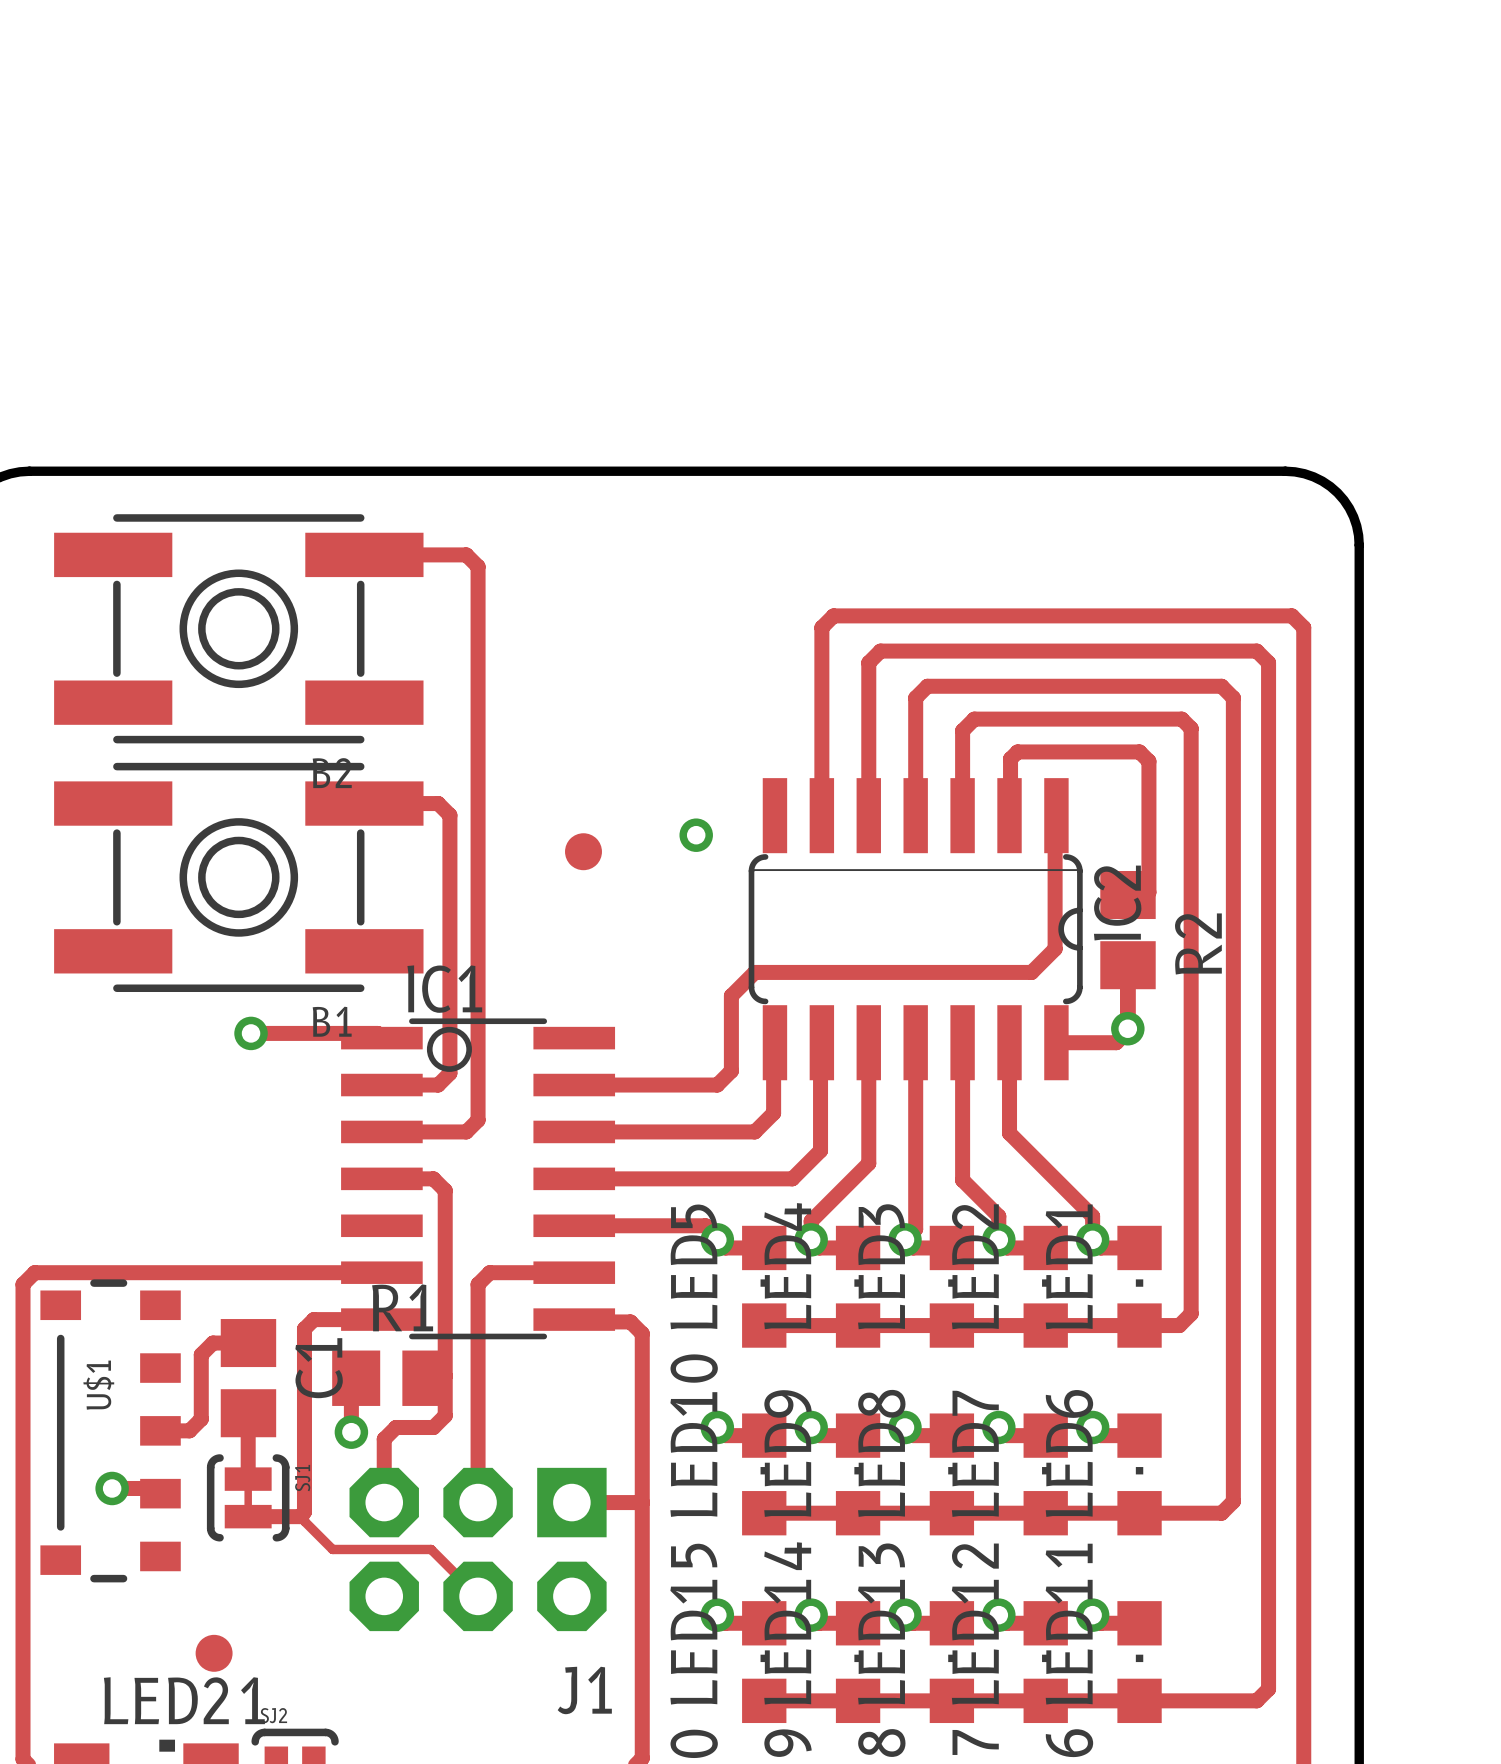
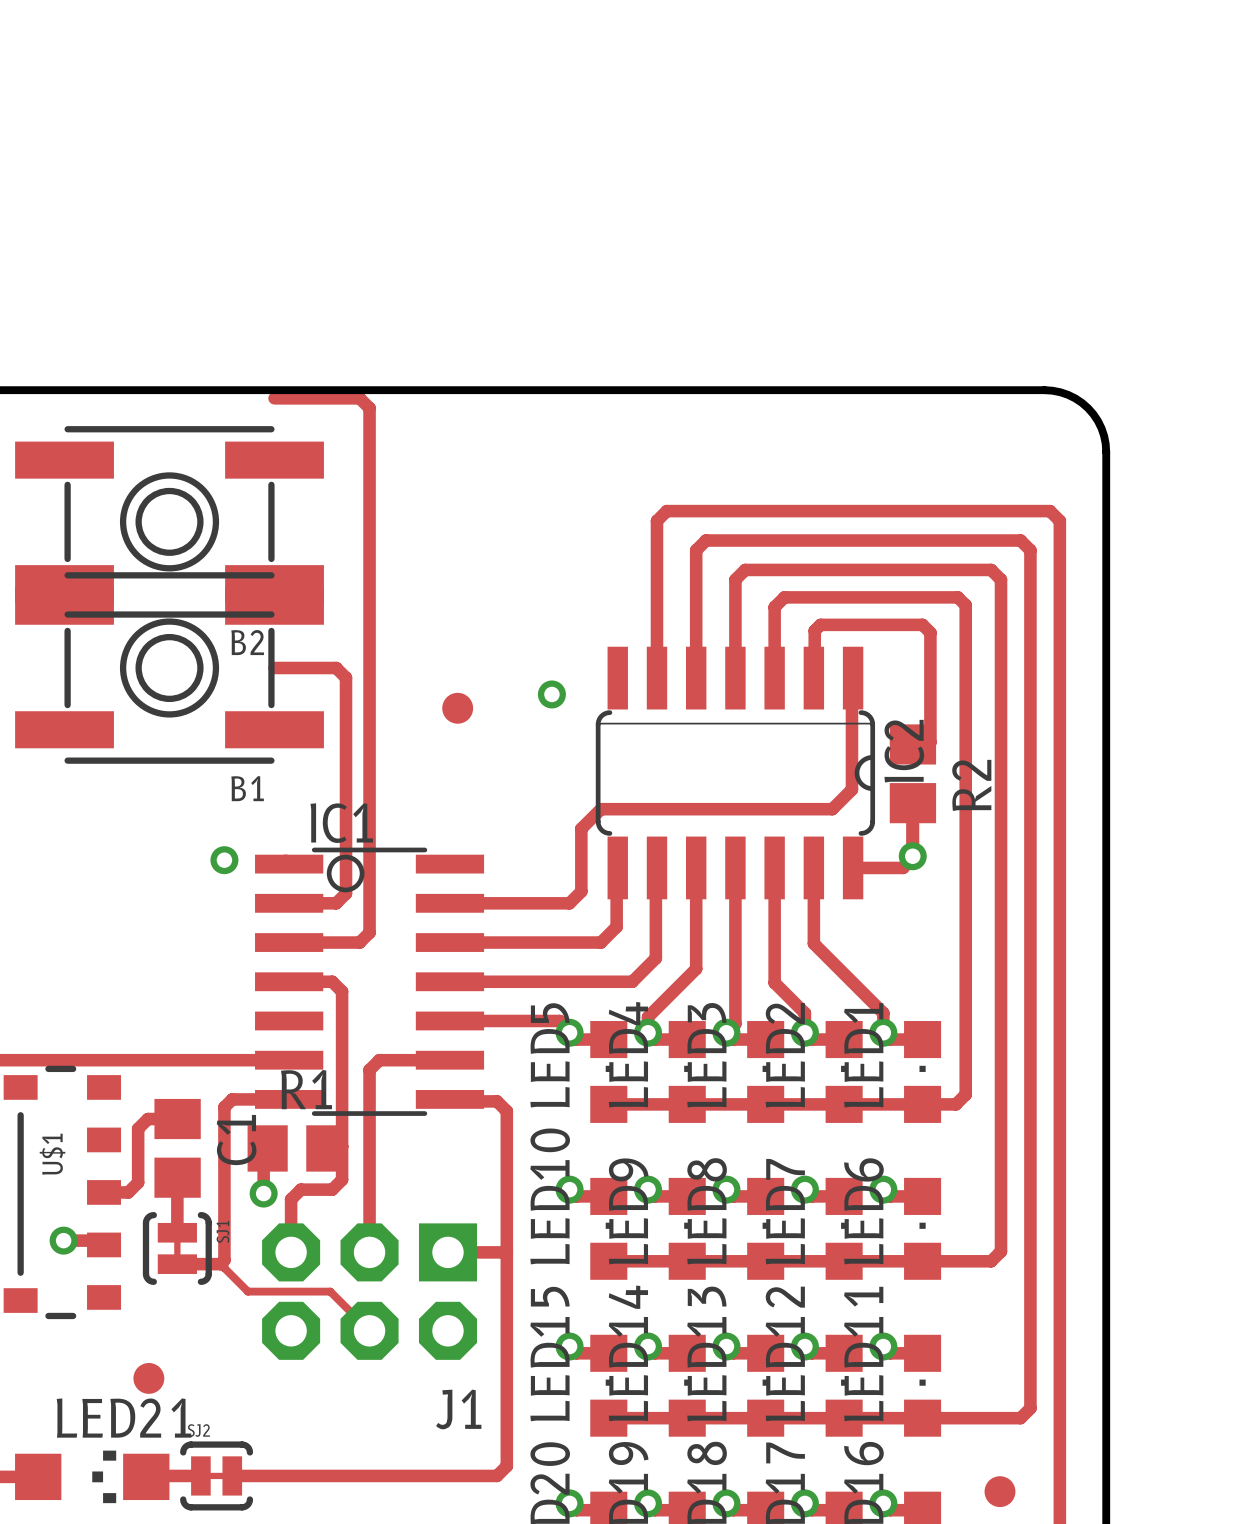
track: (364, 554) (466, 554) (478, 566) -> (274, 398) (359, 398) (369, 408) (369, 469)
B1 position: (238, 877) -> (169, 667)
track: (251, 1033) (377, 1033) -> none
via position: (251, 1033) -> (224, 860)

